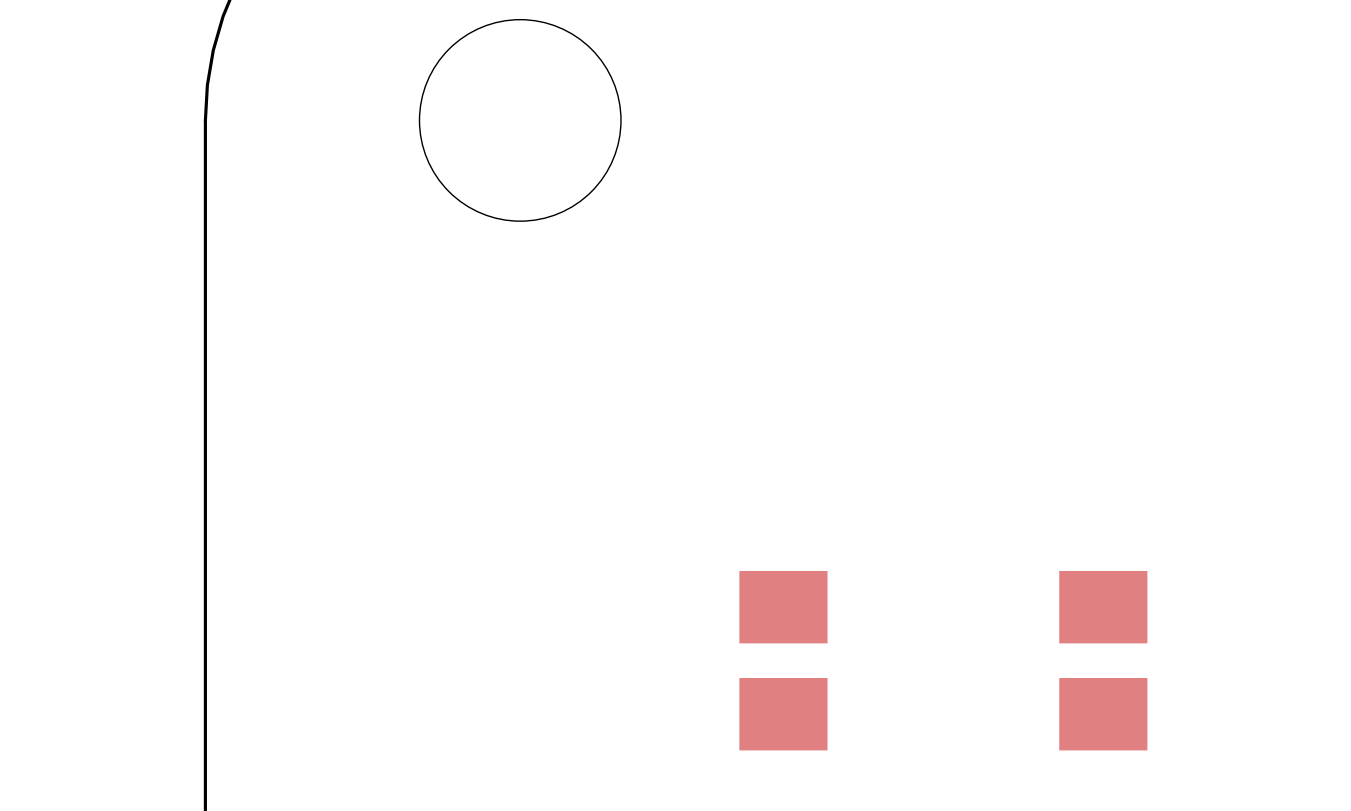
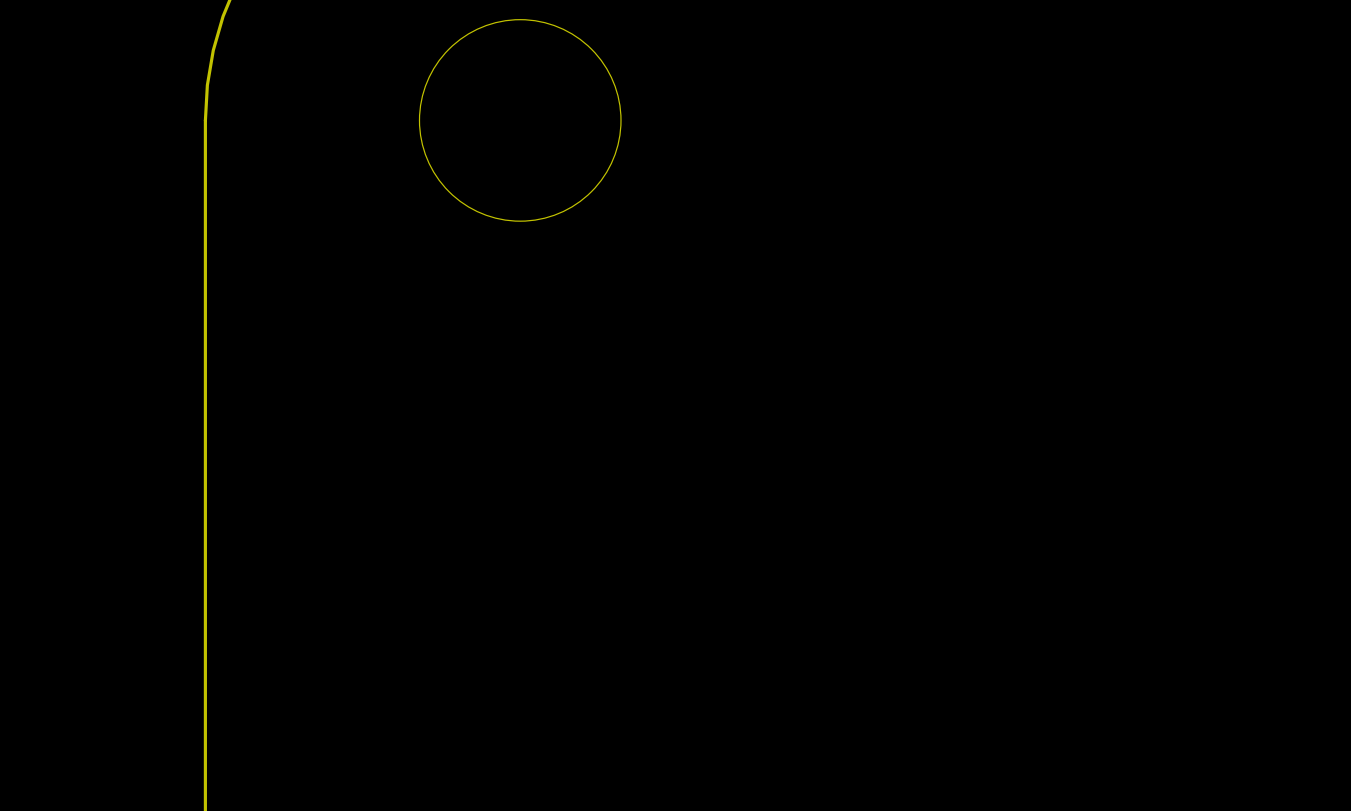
part: (783, 660) -> none
part: (1103, 660) -> none

